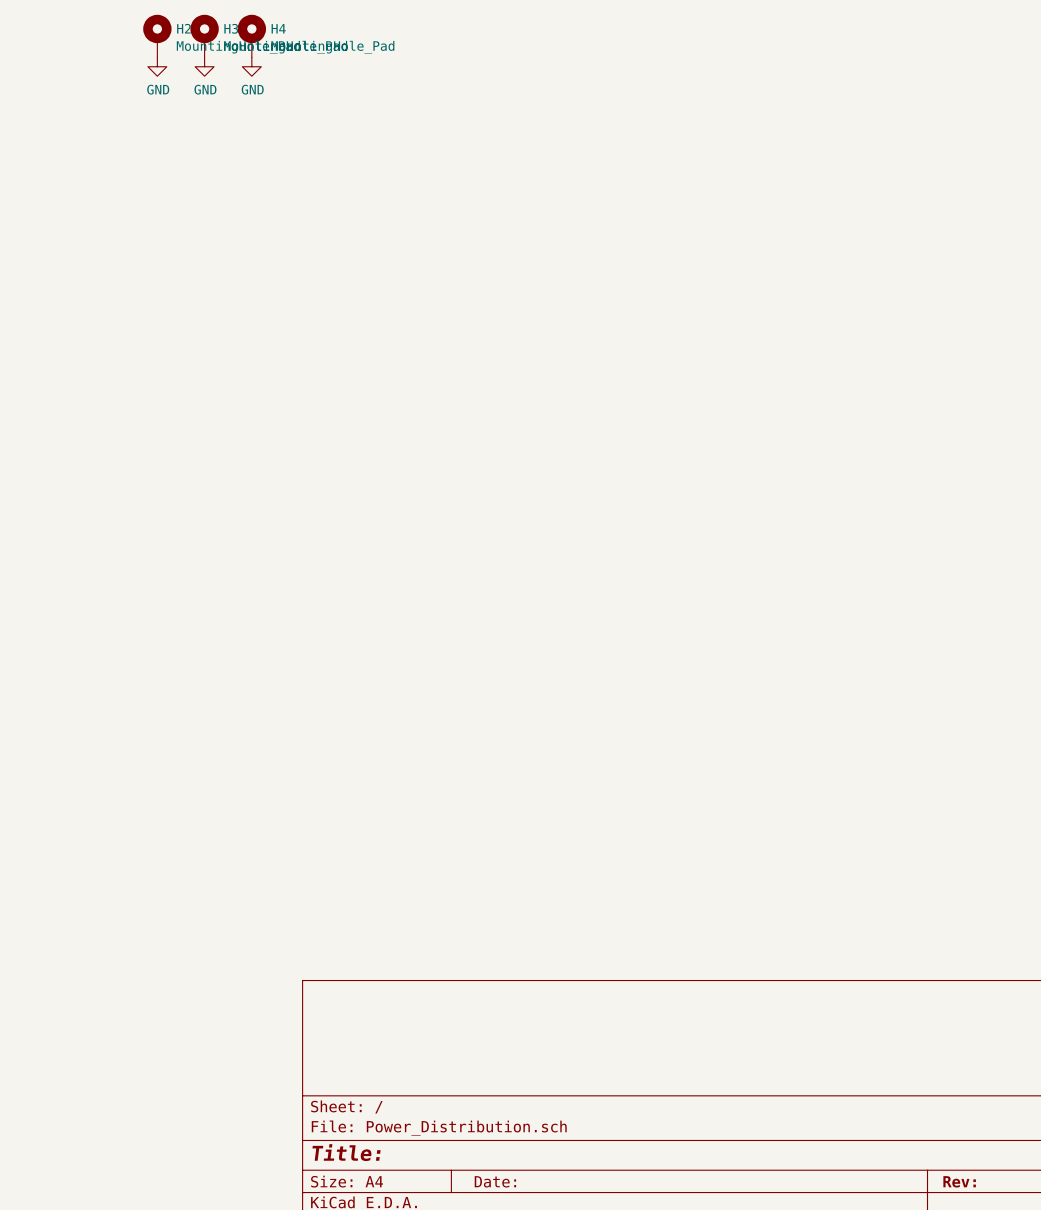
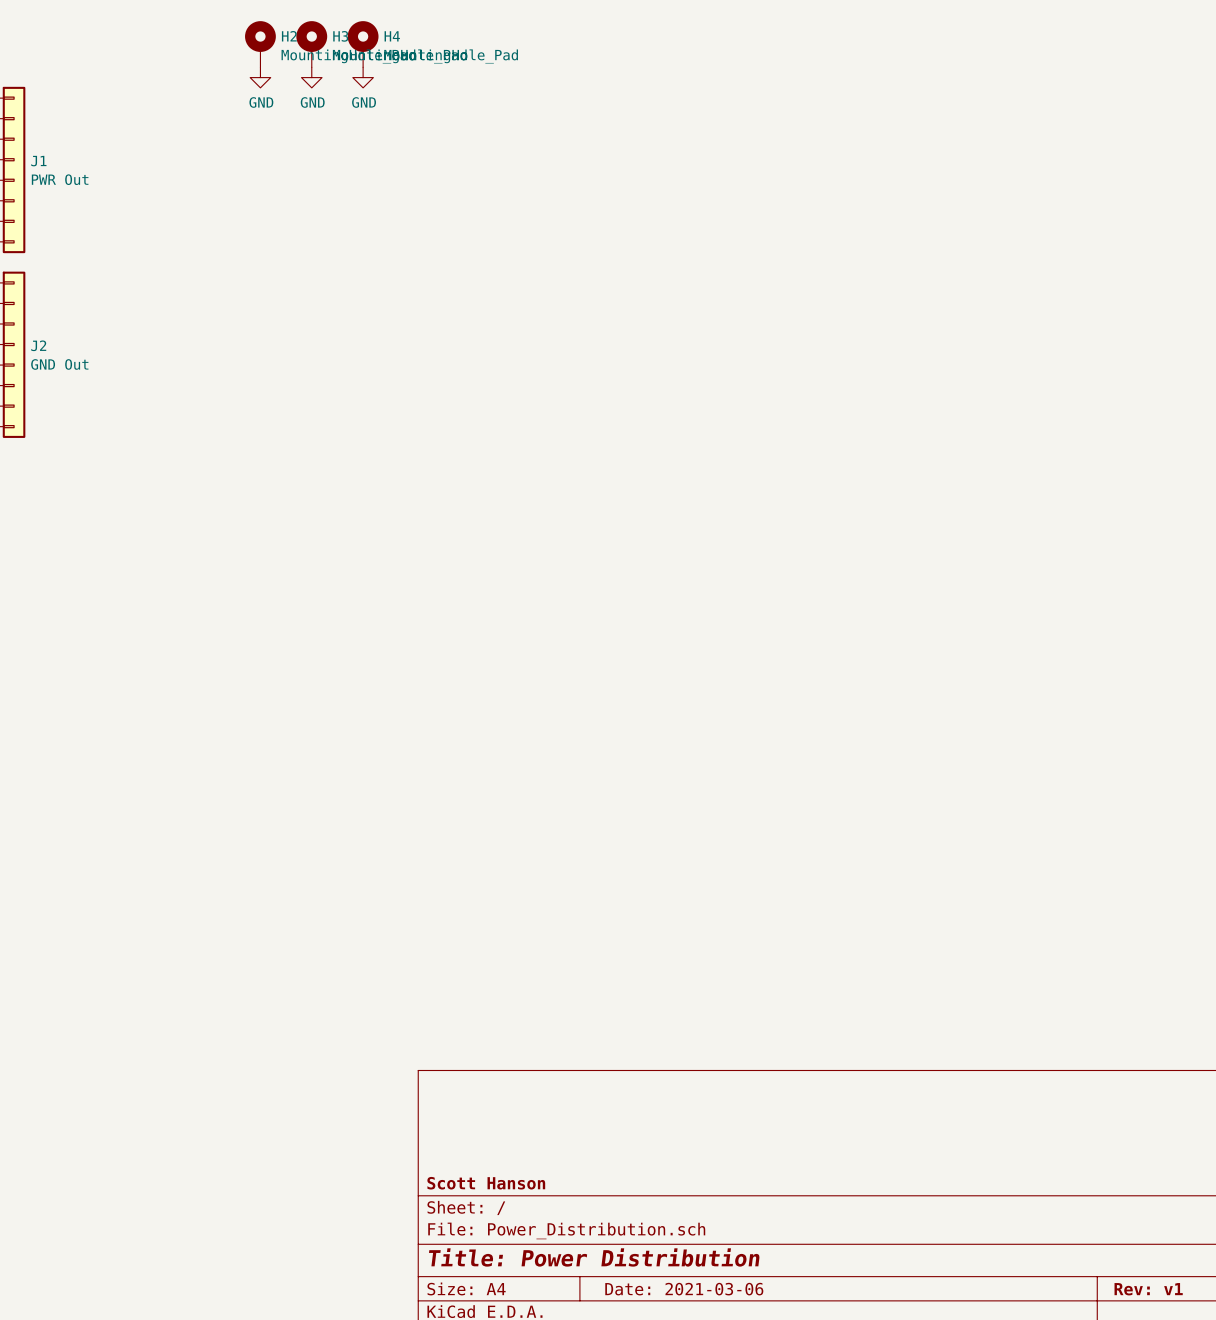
title block: none -> Scott Hanson (486, 1183)
title block: Title: (346, 1152) -> Title: Power Distribution (594, 1257)
title block: Date: (495, 1181) -> Date: 2021-03-06 (684, 1289)
title block: Rev: (959, 1181) -> Rev: v1 (1148, 1289)

